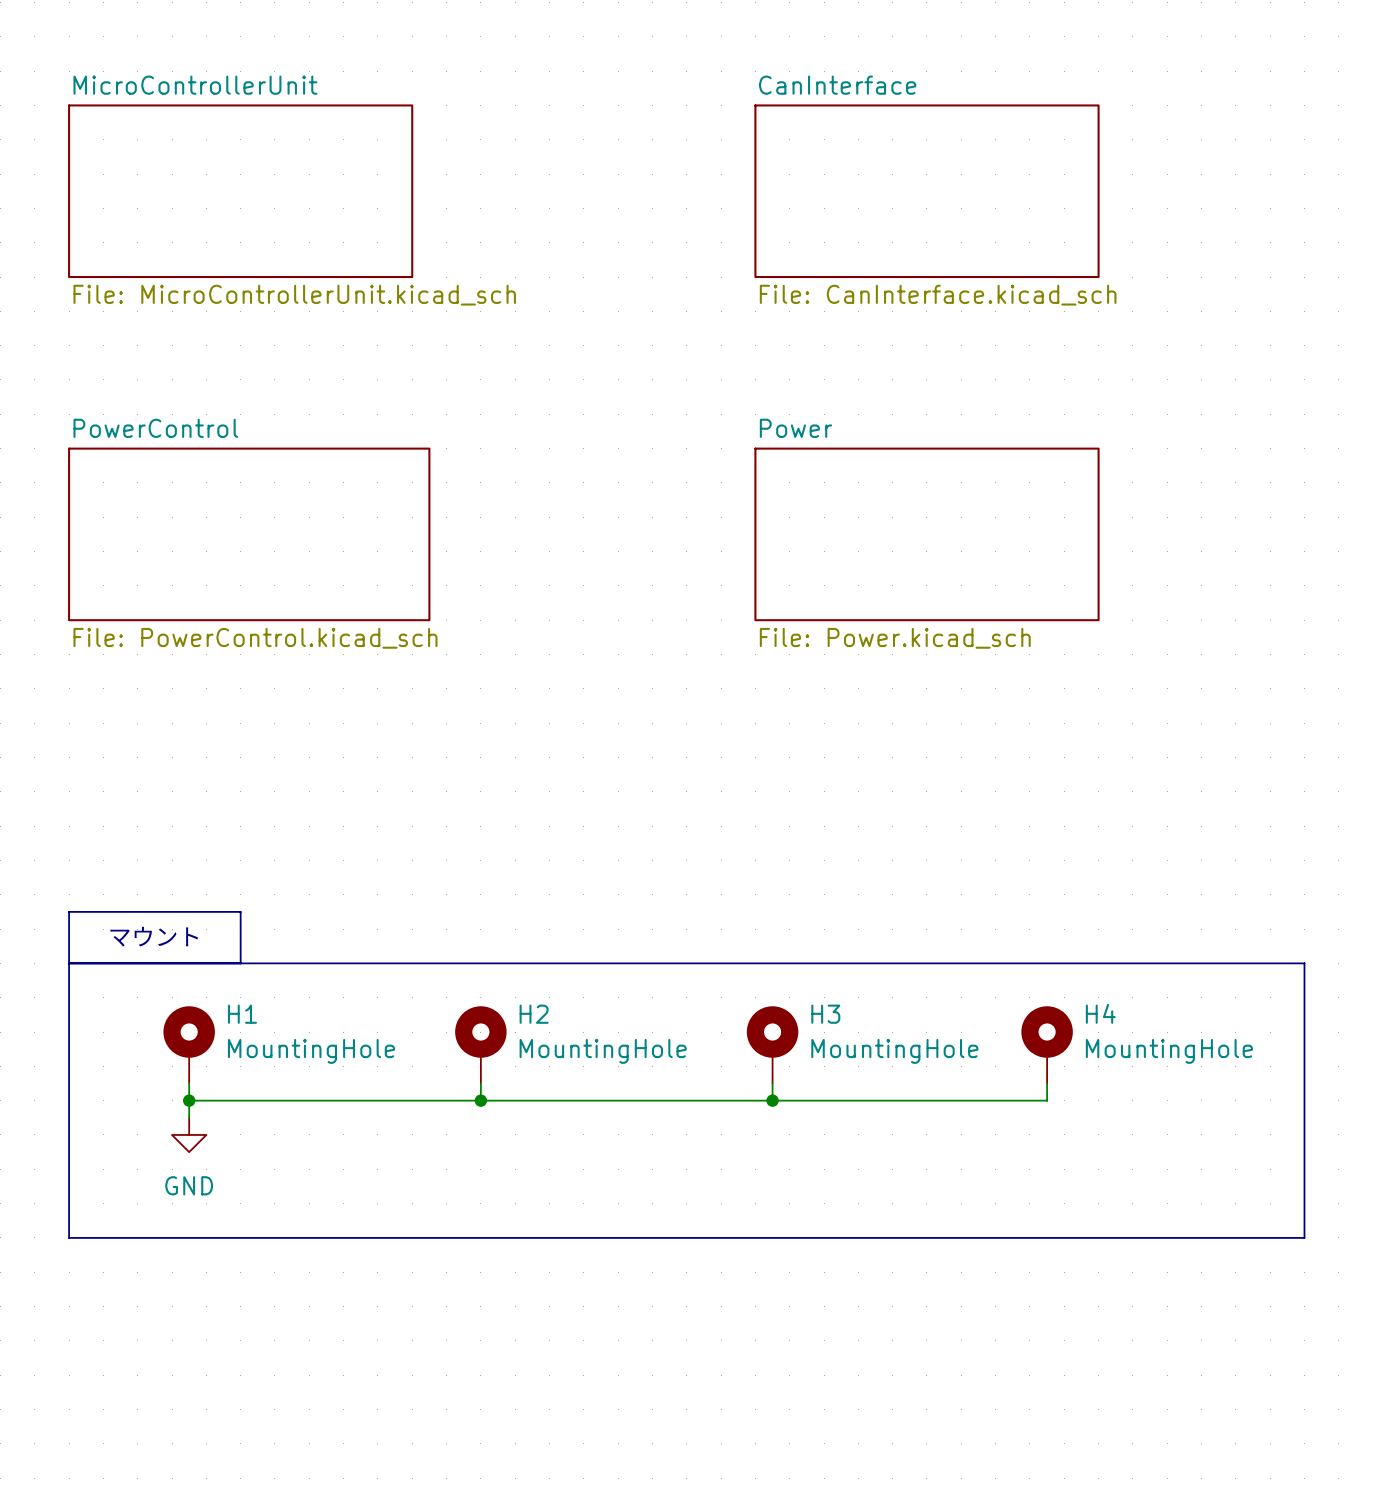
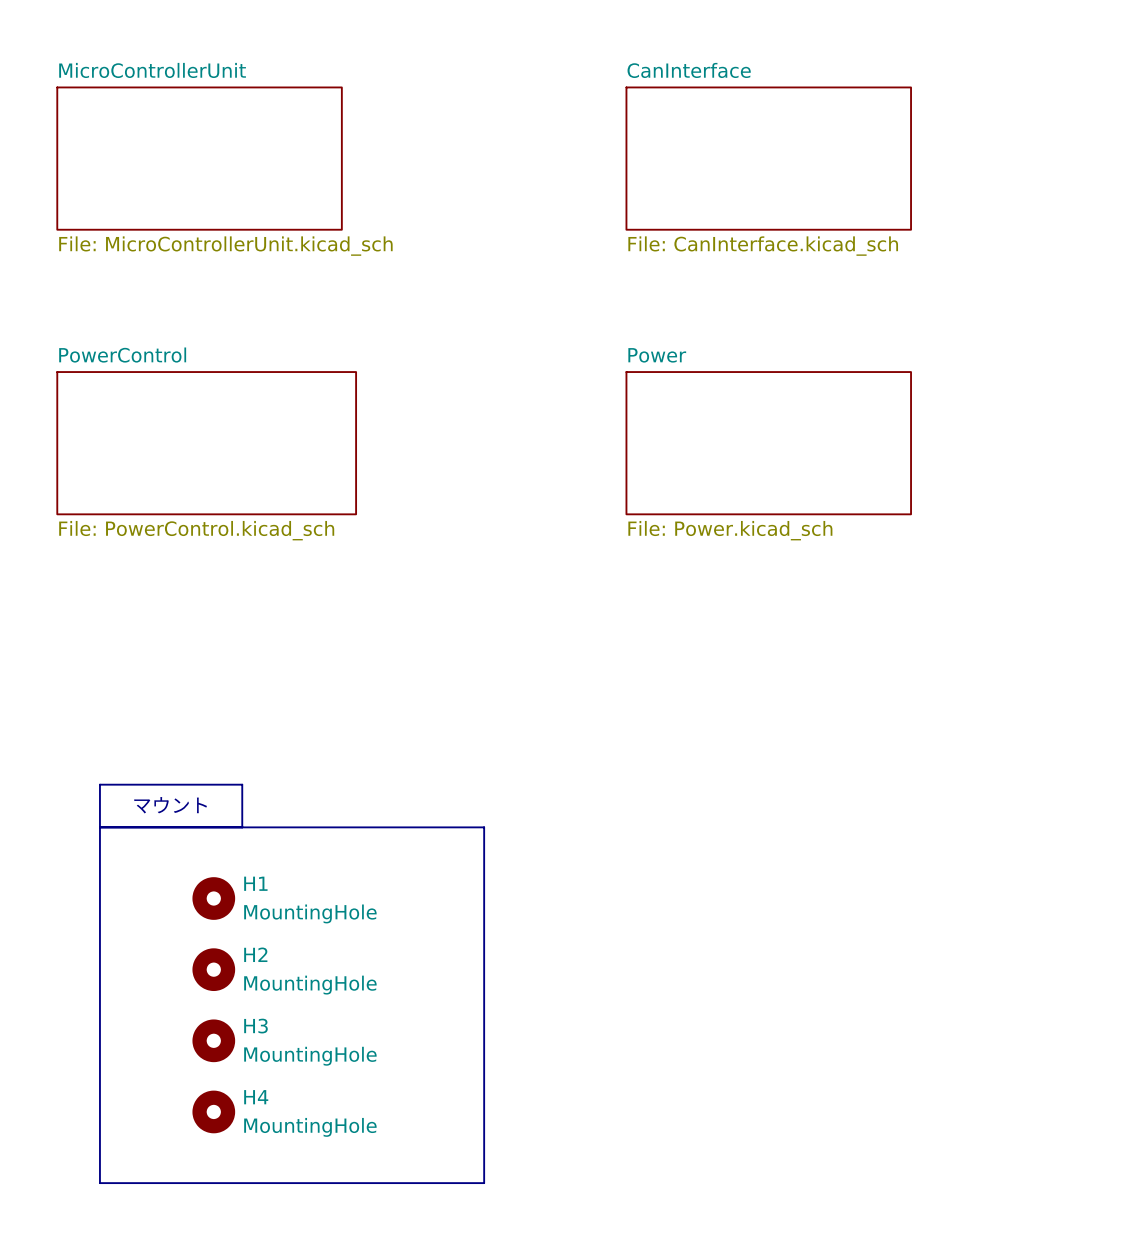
text position: マウント (154, 936) -> マウント (170, 805)
line: (69, 963) (1304, 963) (1304, 1237) (69, 1237) (69, 911) (240, 911) (240, 963) -> none
line: none -> (99, 827) (484, 827) (484, 1183) (99, 1183) (99, 784) (242, 784) (242, 827)
H1 symbol: [163, 1006, 215, 1084] -> [192, 877, 236, 920]
H2 symbol: [455, 1006, 507, 1084] -> [192, 948, 236, 992]
H3 symbol: [746, 1006, 799, 1084] -> [192, 1019, 236, 1063]
H4 symbol: [1021, 1006, 1073, 1084] -> [192, 1090, 236, 1134]
wire: (189, 1083) (189, 1117) -> none
wire: (480, 1083) (480, 1100) -> none
wire: (772, 1083) (772, 1100) -> none
wire: (1047, 1083) (1047, 1100) (189, 1100) -> none
junction: (189, 1100) -> none
junction: (480, 1100) -> none
junction: (772, 1100) -> none
power symbol: GND (189, 1134) -> none

